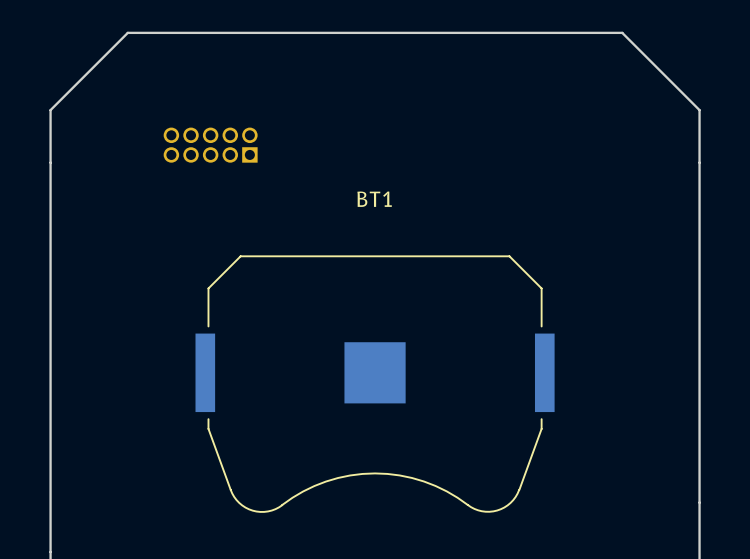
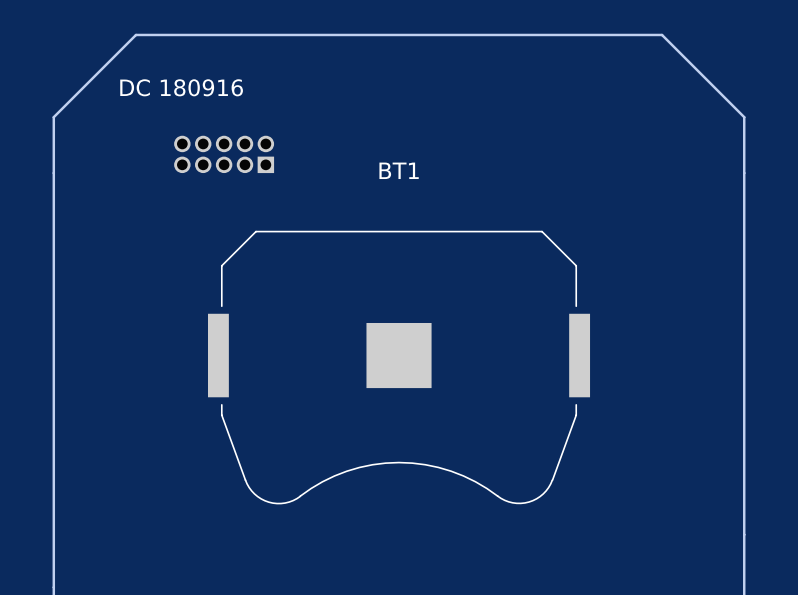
text: none -> DC 180916 (181, 87)
BT1 position: (375, 384) -> (399, 367)

